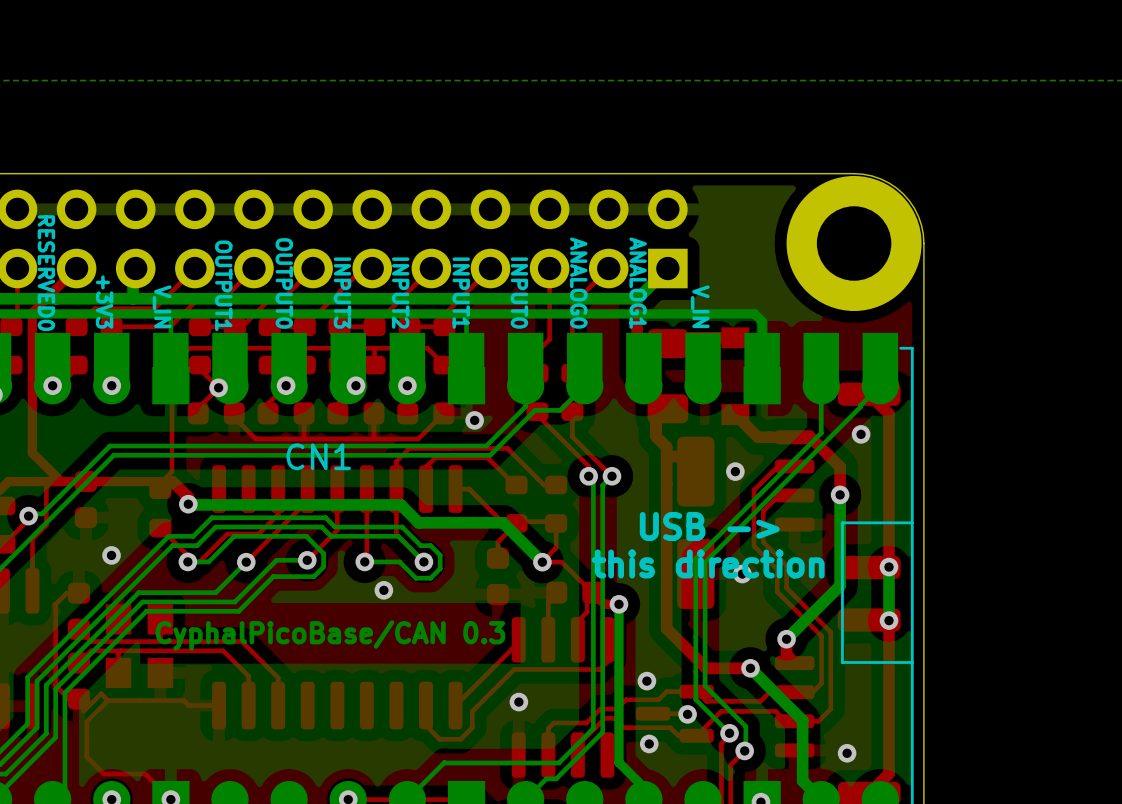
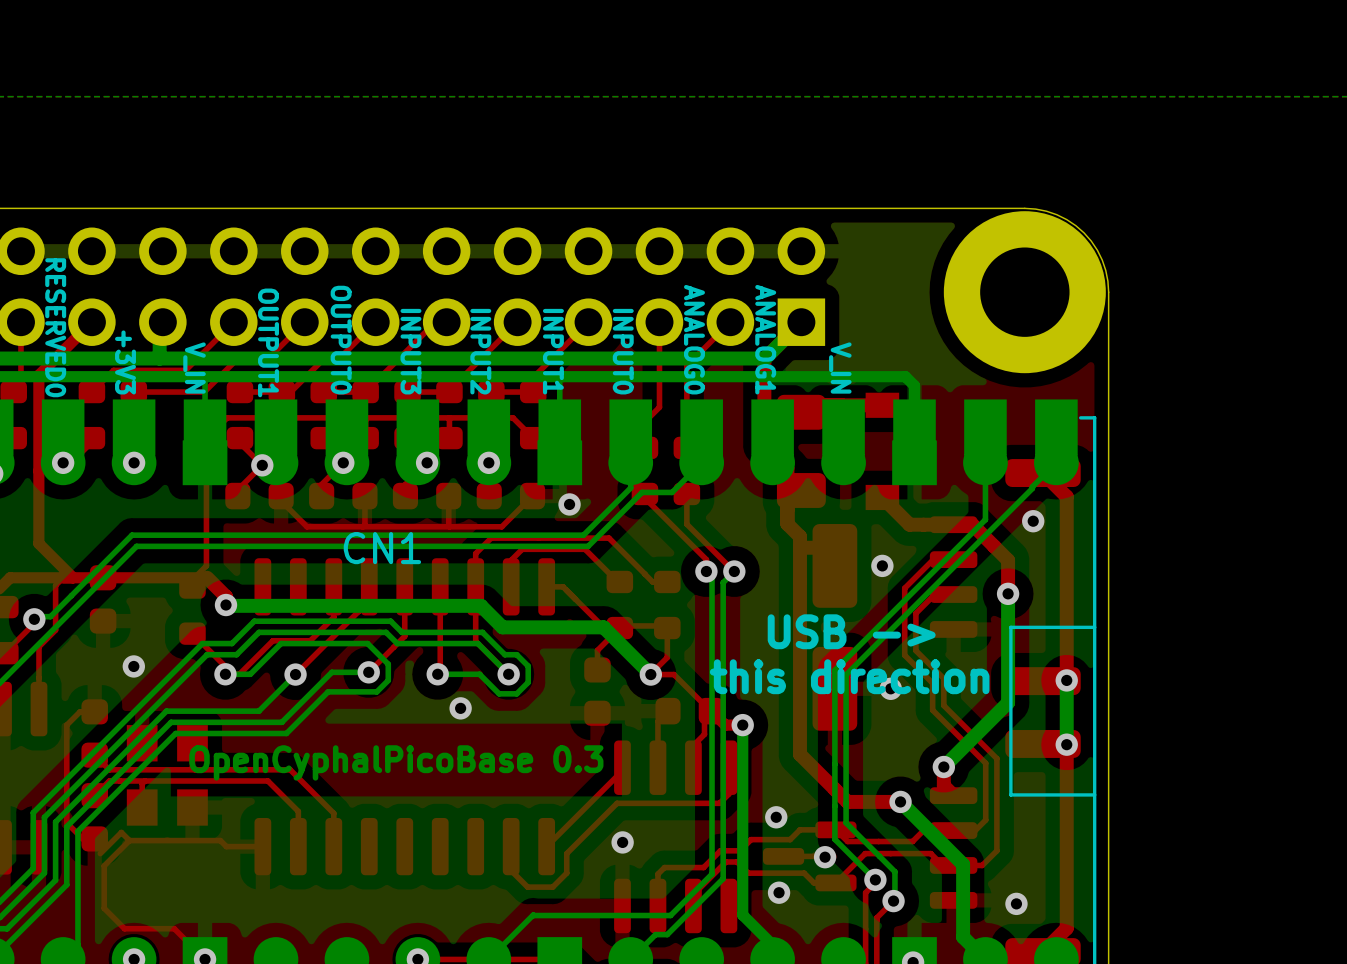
text: CyphalPicoBase/CAN 0.3 (330, 635) -> OpenCyphalPicoBase 0.3 (396, 762)

